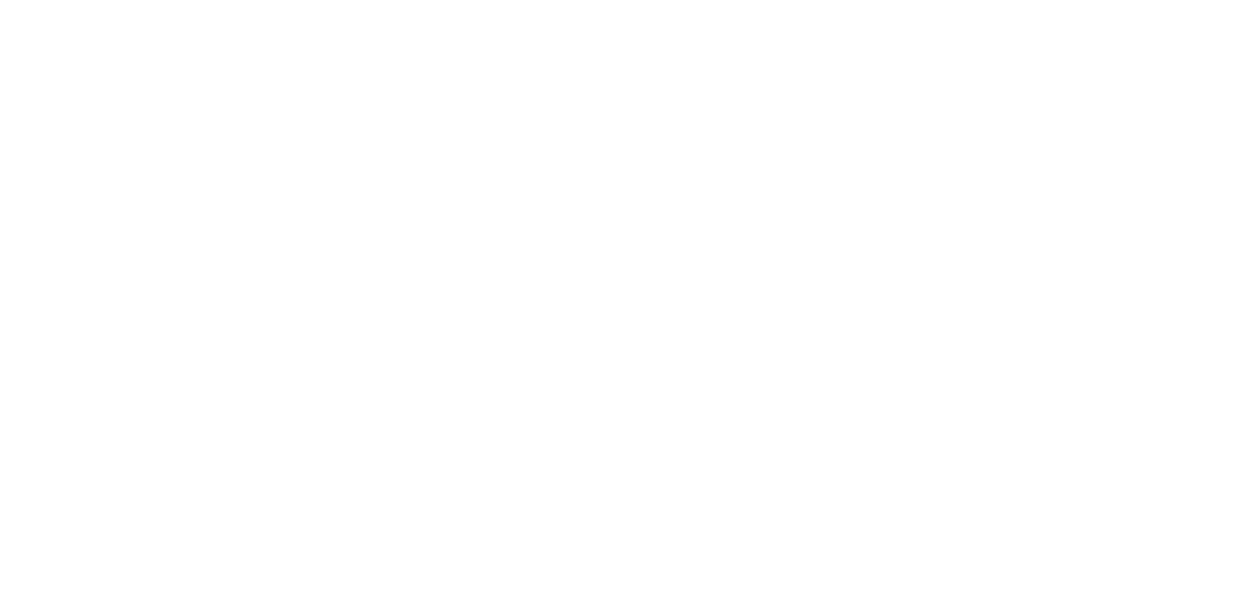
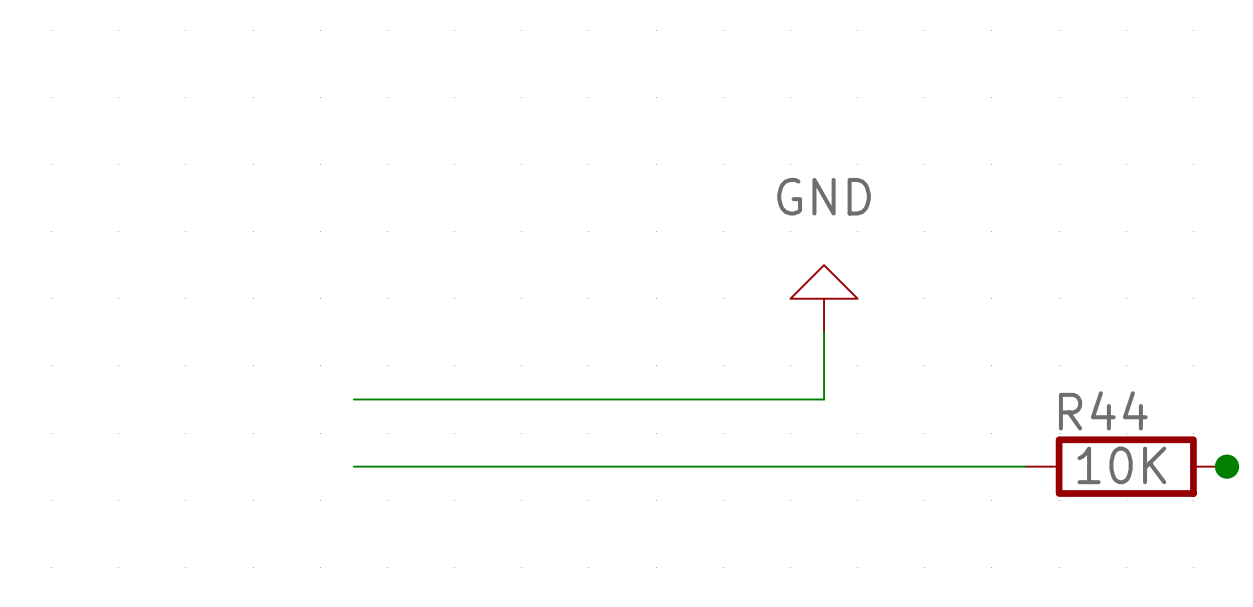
power symbol: none -> GND (824, 298)
wire: none -> (824, 332) (824, 399) (353, 399)
wire: none -> (353, 466) (1025, 466)
R44: none -> 10K (1126, 466)
junction: none -> (1227, 466)

